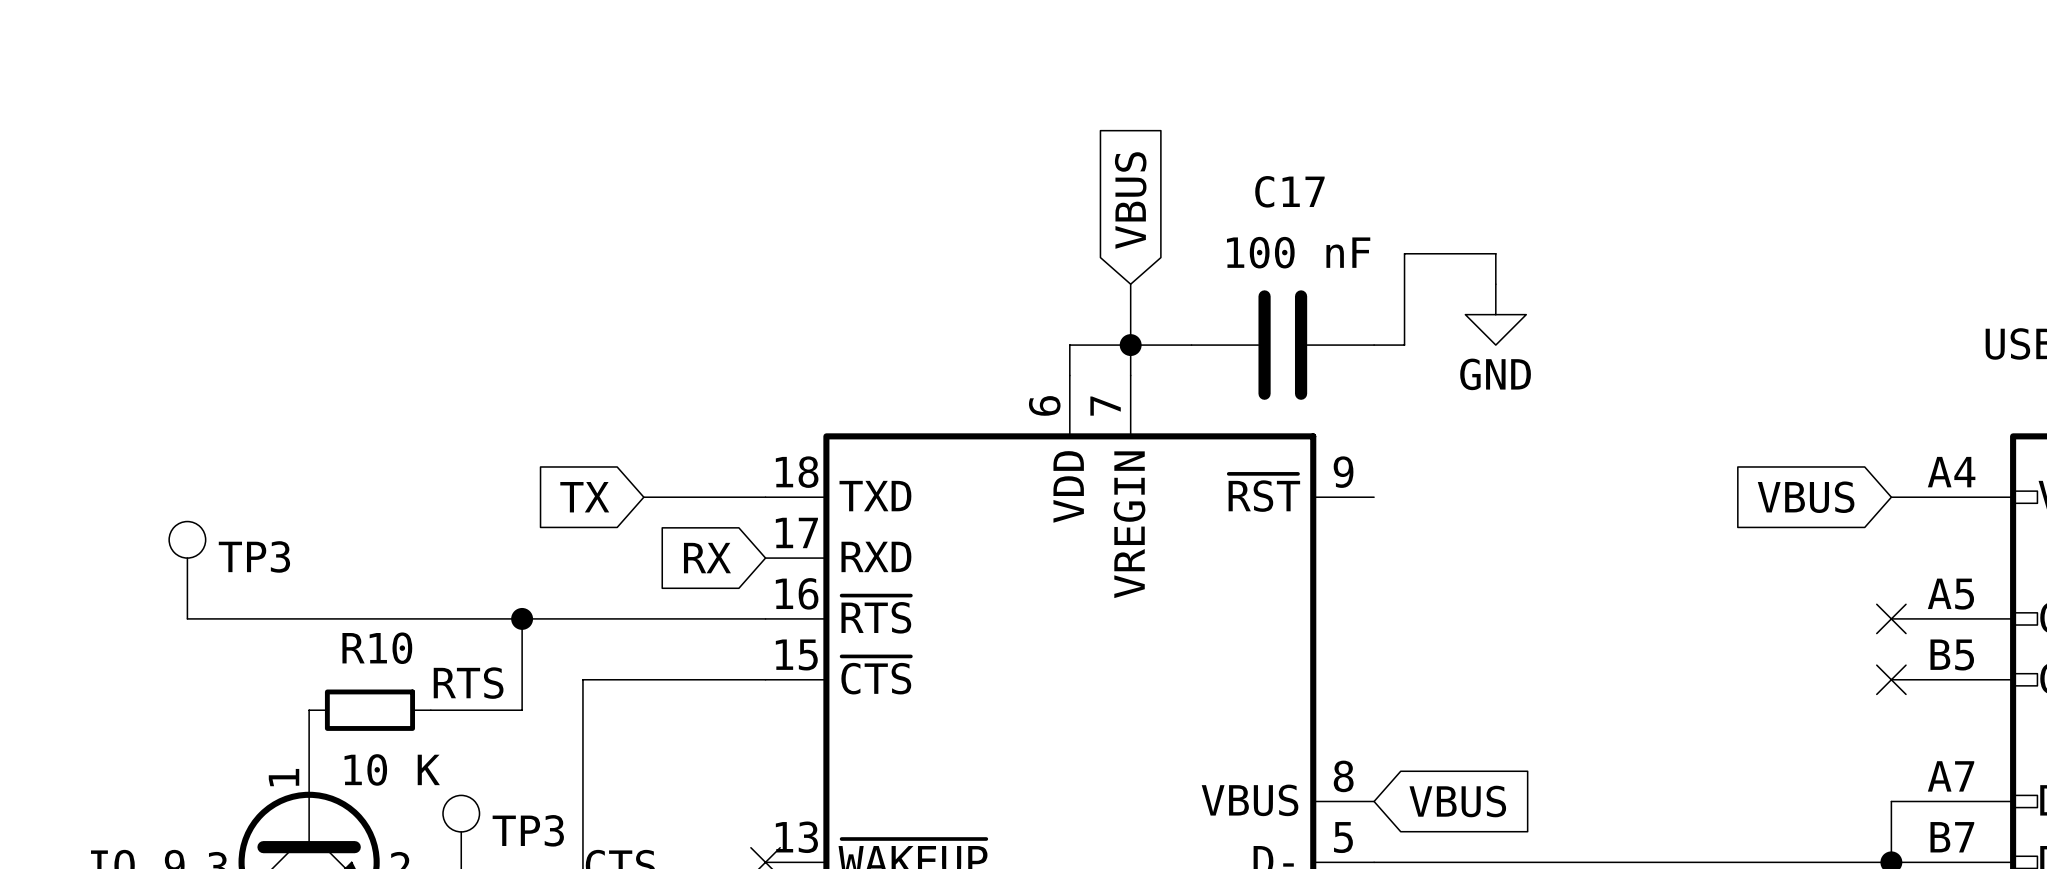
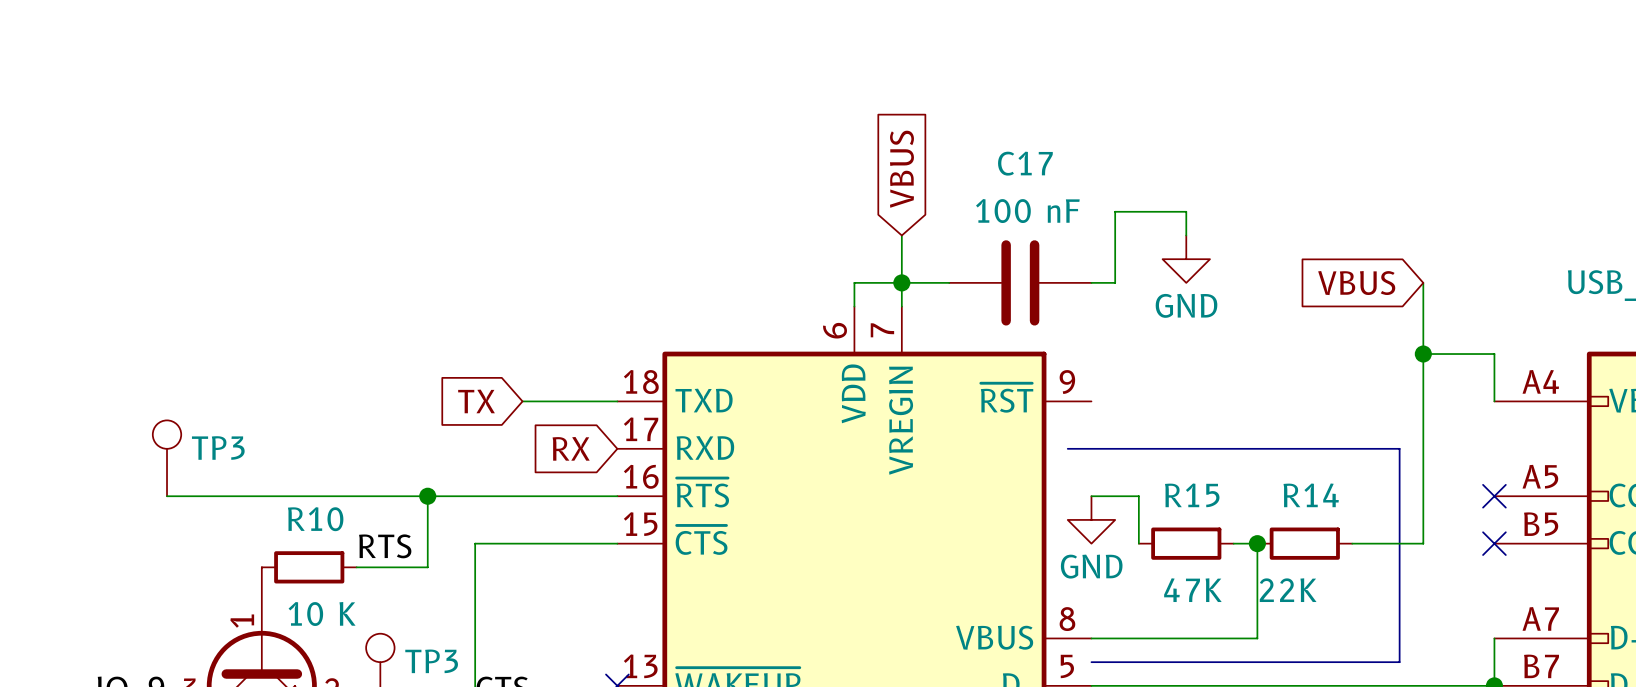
wire: none -> (1423, 282) (1423, 543) (1352, 543)
wire: none -> (1423, 354) (1494, 354) (1494, 401)
junction: none -> (1423, 354)
global label position: VBUS (1806, 497) -> VBUS (1356, 283)
line: none -> (1067, 448) (1399, 448) (1399, 662) (1091, 662)
wire: none -> (1091, 496) (1138, 496) (1138, 543)
power symbol: none -> GND (1091, 519)
R15: none -> 47K (1186, 543)
wire: none -> (1233, 543) (1257, 543) (1257, 638) (1091, 638)
junction: none -> (1257, 543)
R14: none -> 22K (1304, 543)
global label: VBUS (1457, 801) -> none

